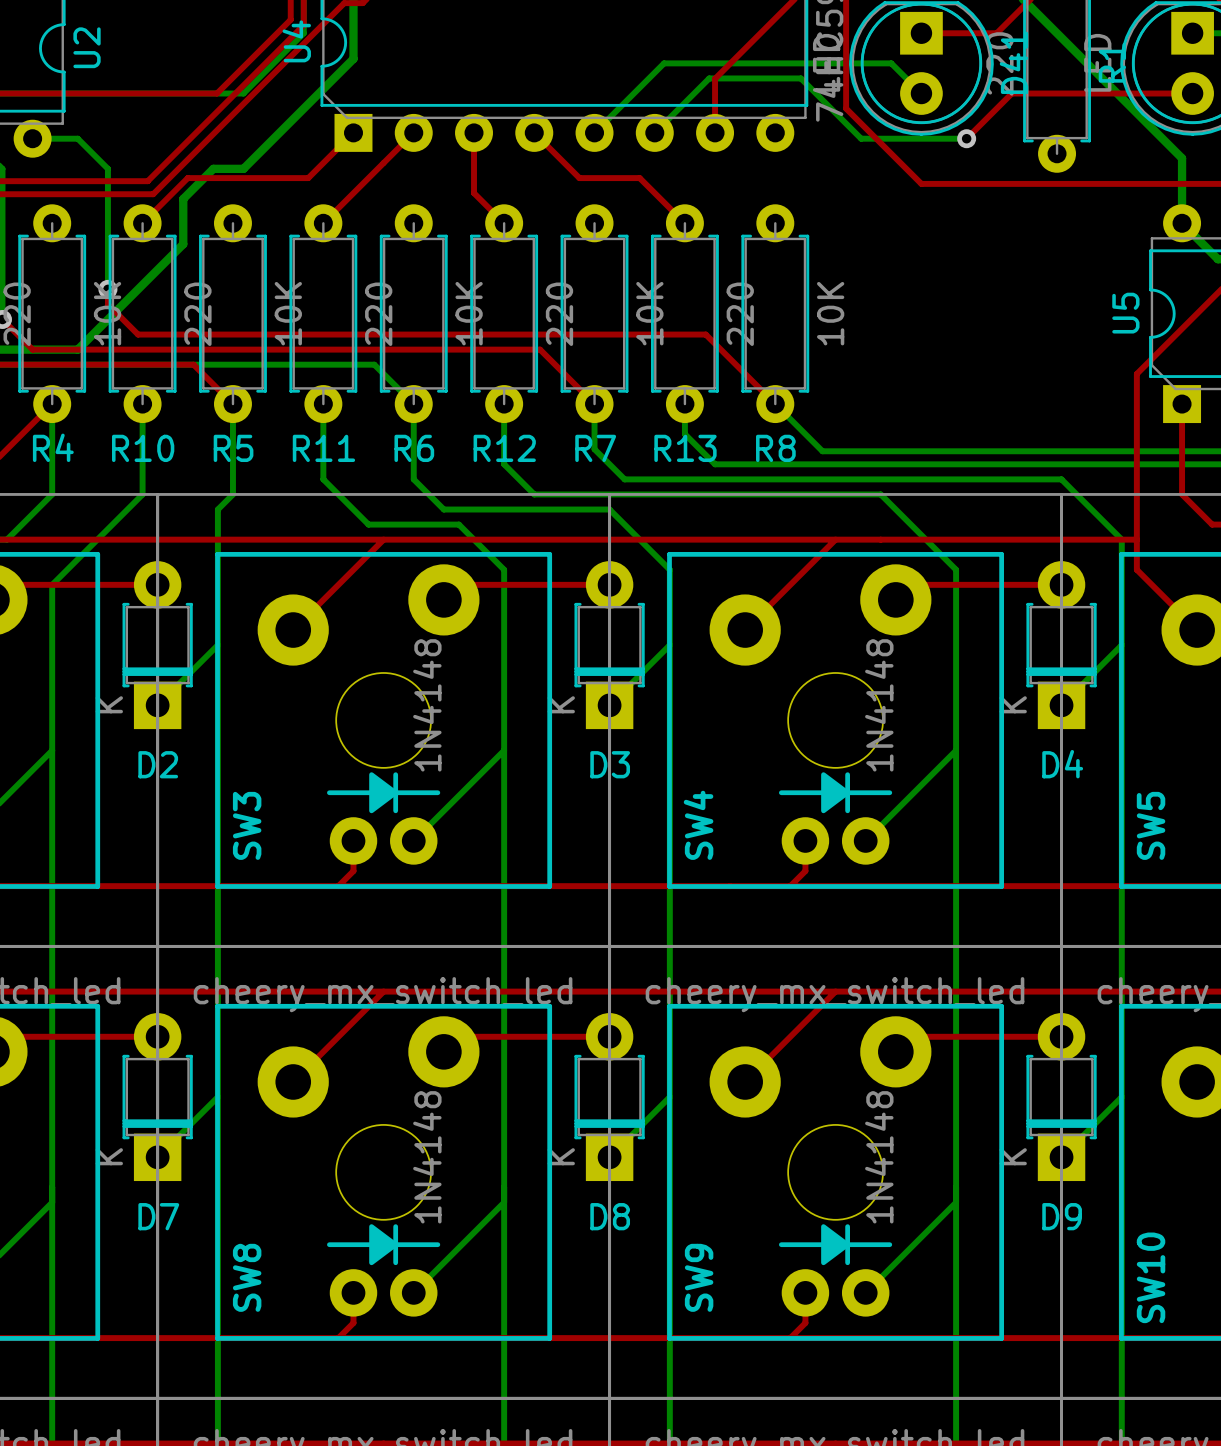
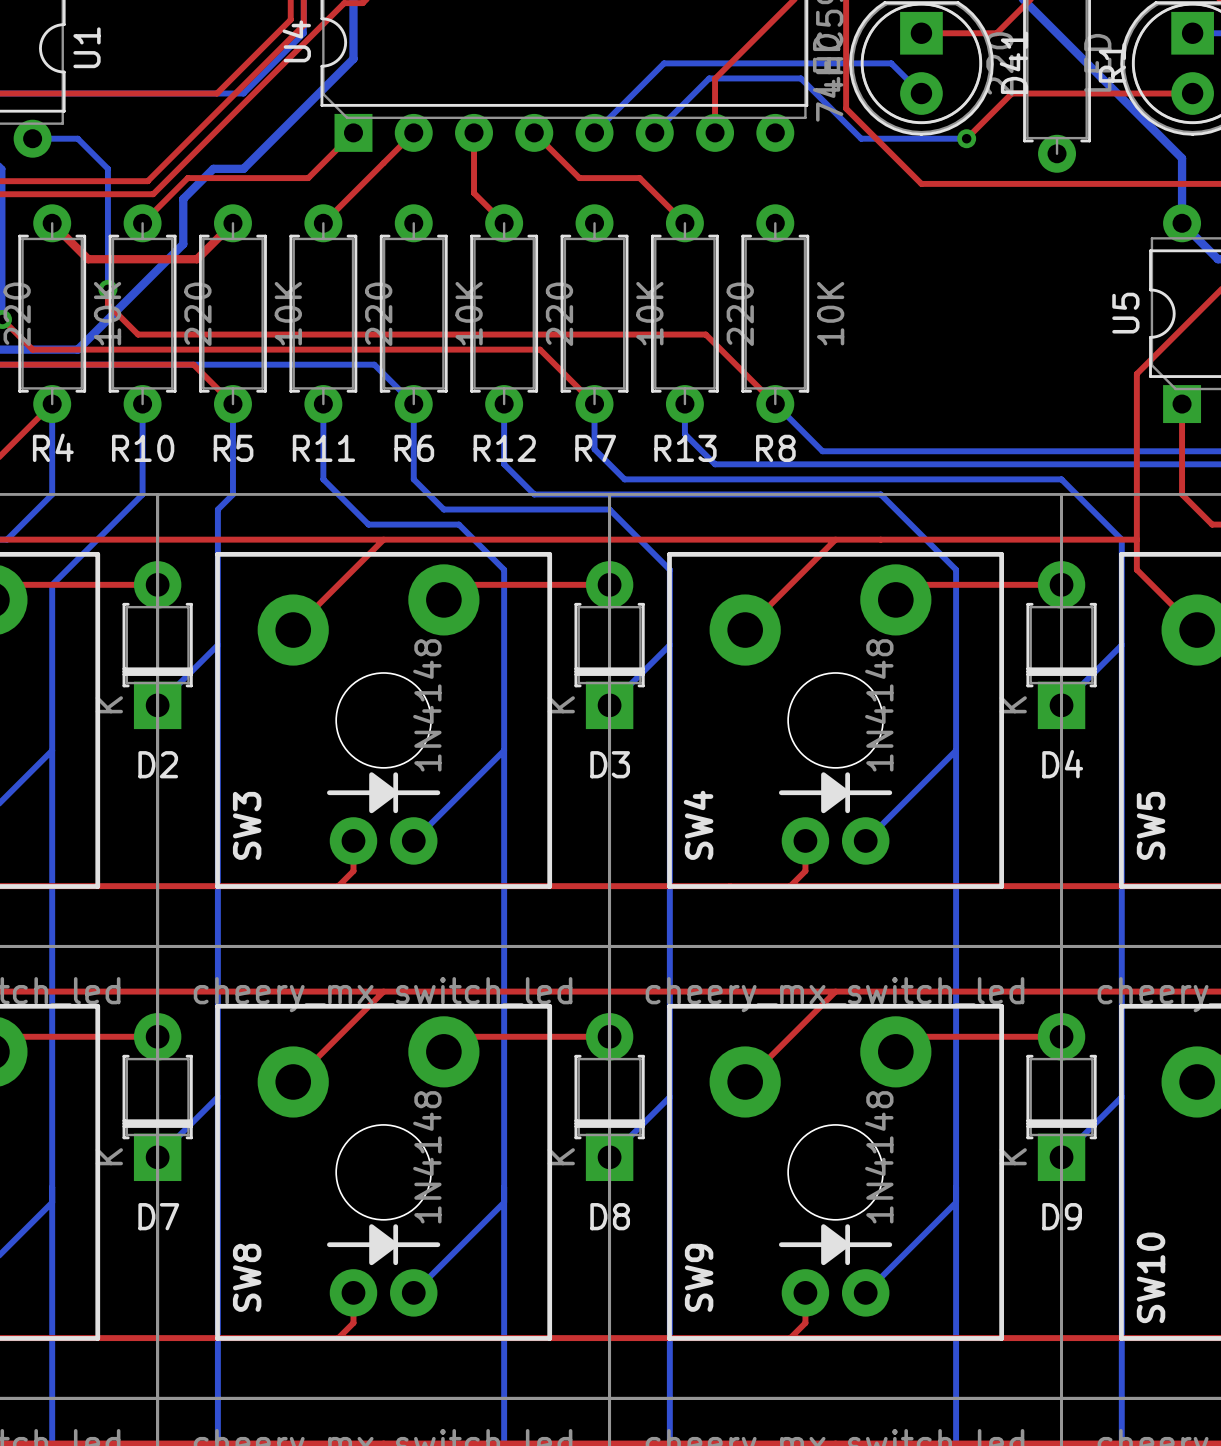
U2 name: U2 (87, 47) -> U1 (87, 47)
top track: none -> (52, 223) (88, 259) (197, 259) (232, 223)

